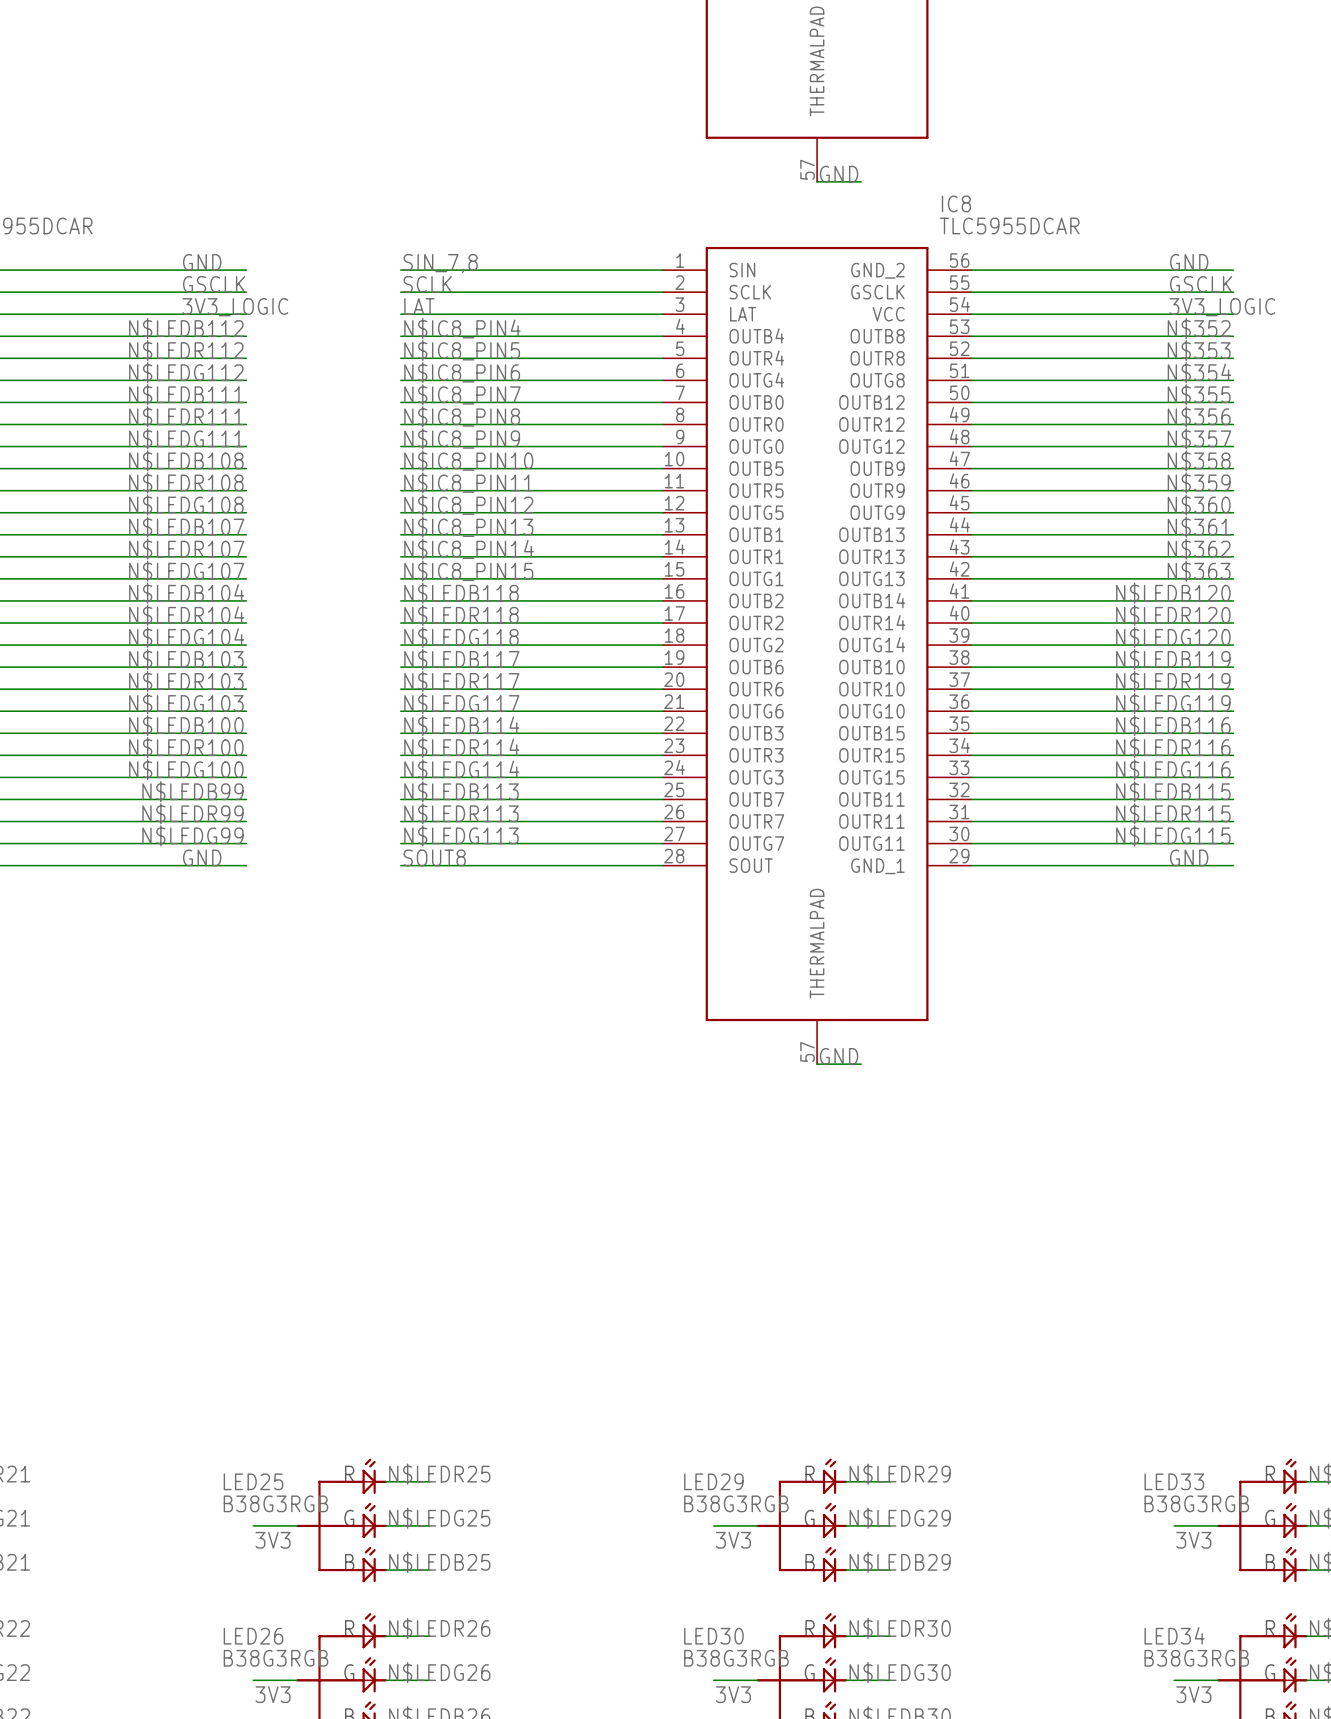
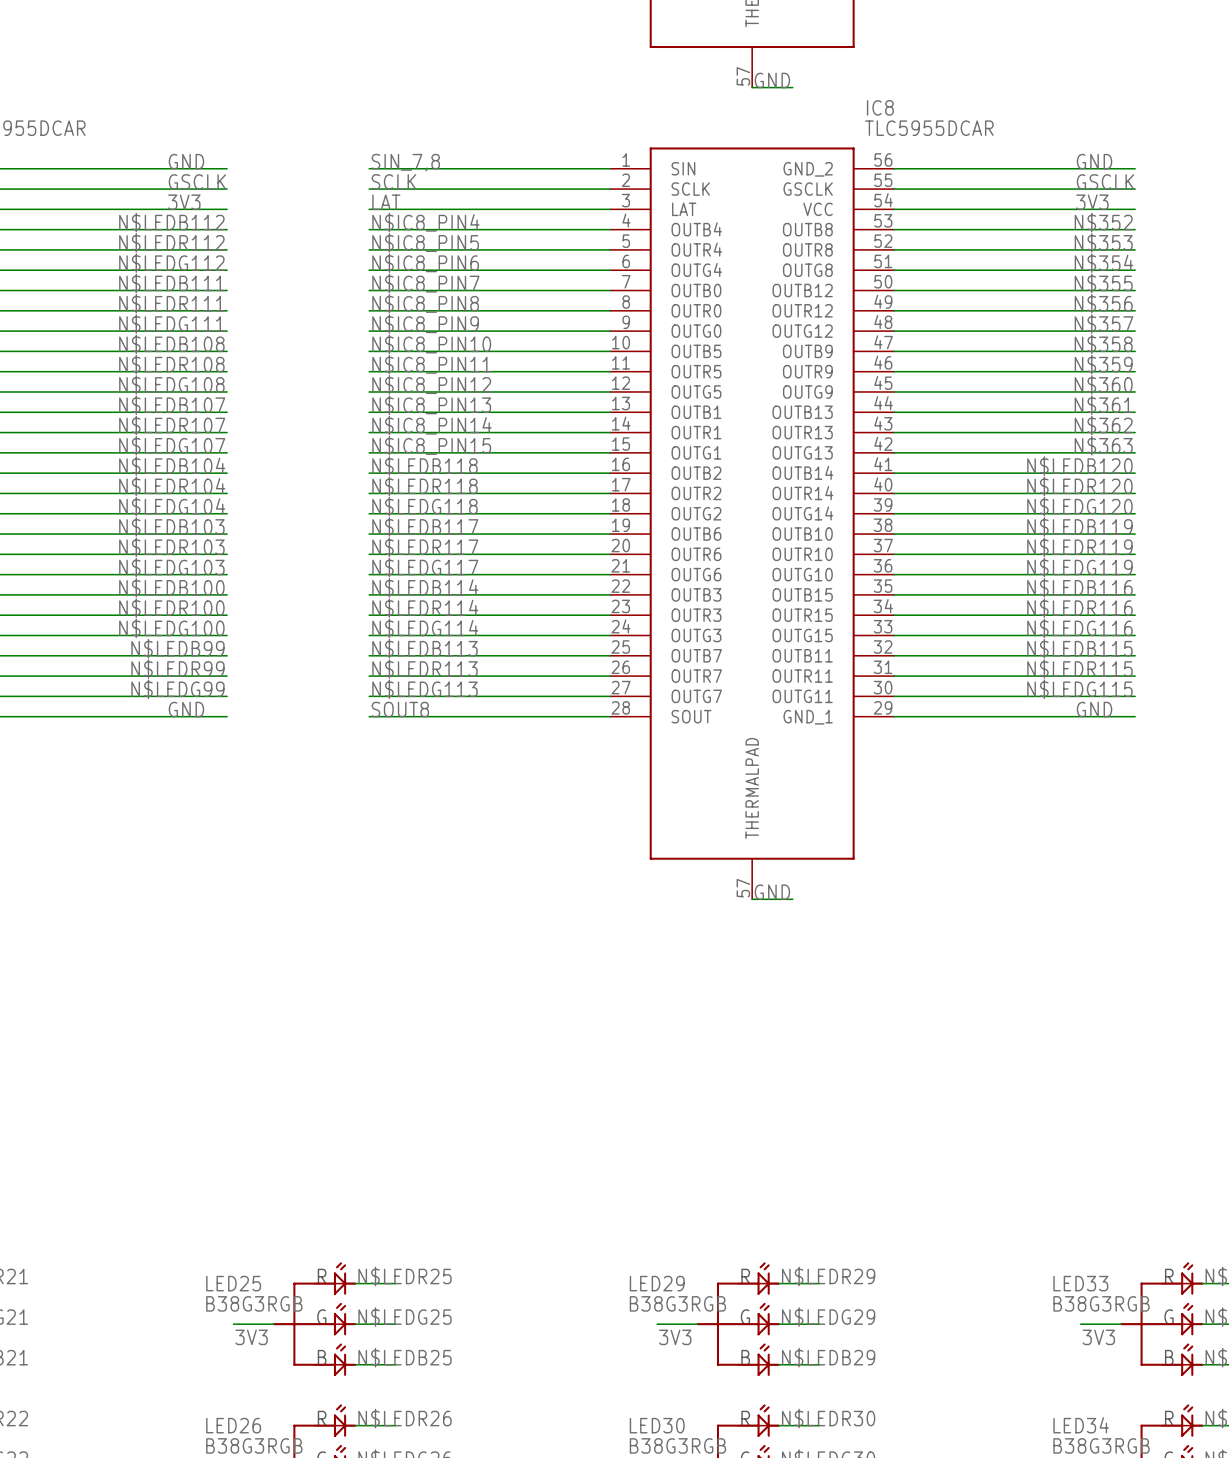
label: 3V3_LOGIC (235, 307) -> 3V3 (184, 202)
label: 3V3_LOGIC (1222, 307) -> 3V3 (1092, 202)

